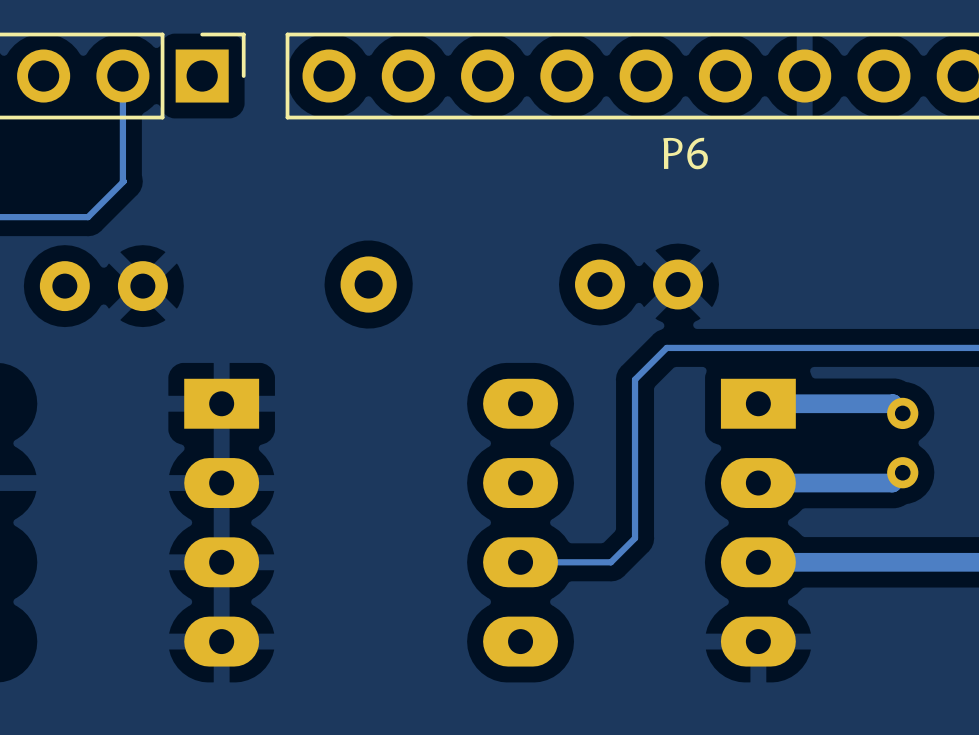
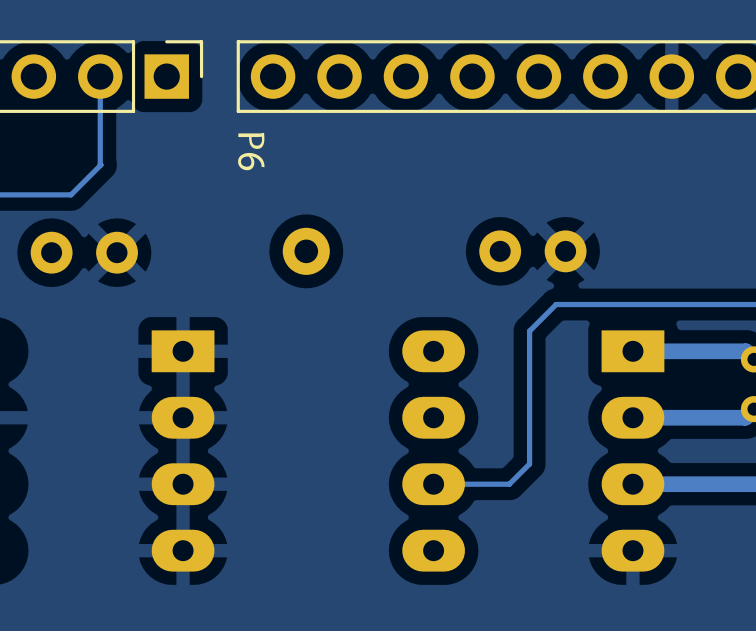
P6 name rotation: 0° (685, 153) -> 90° clockwise (251, 151)
P6 name position: P6 (685, 153) -> P6 (251, 151)

